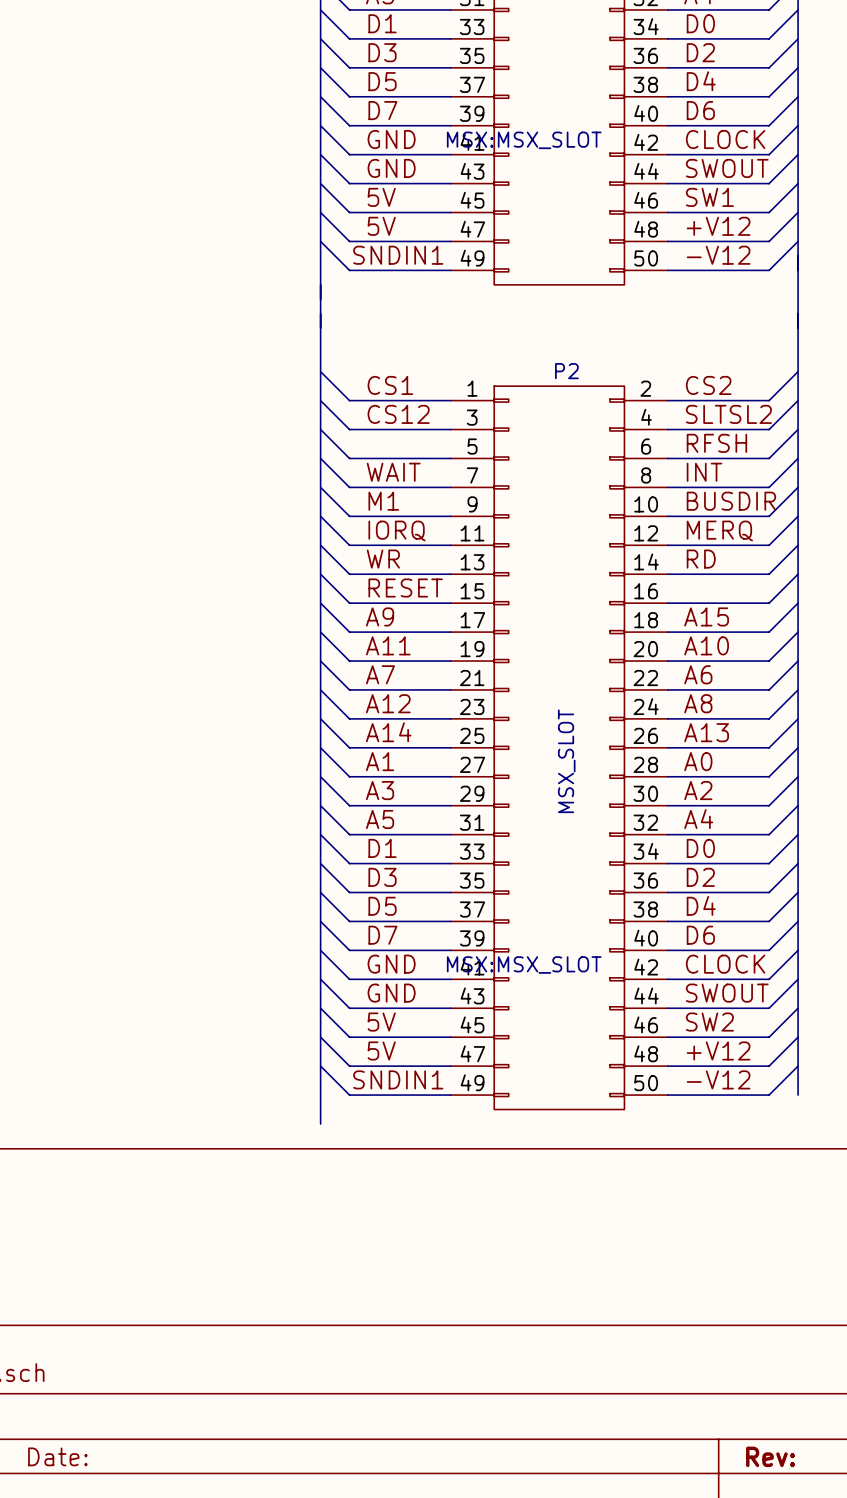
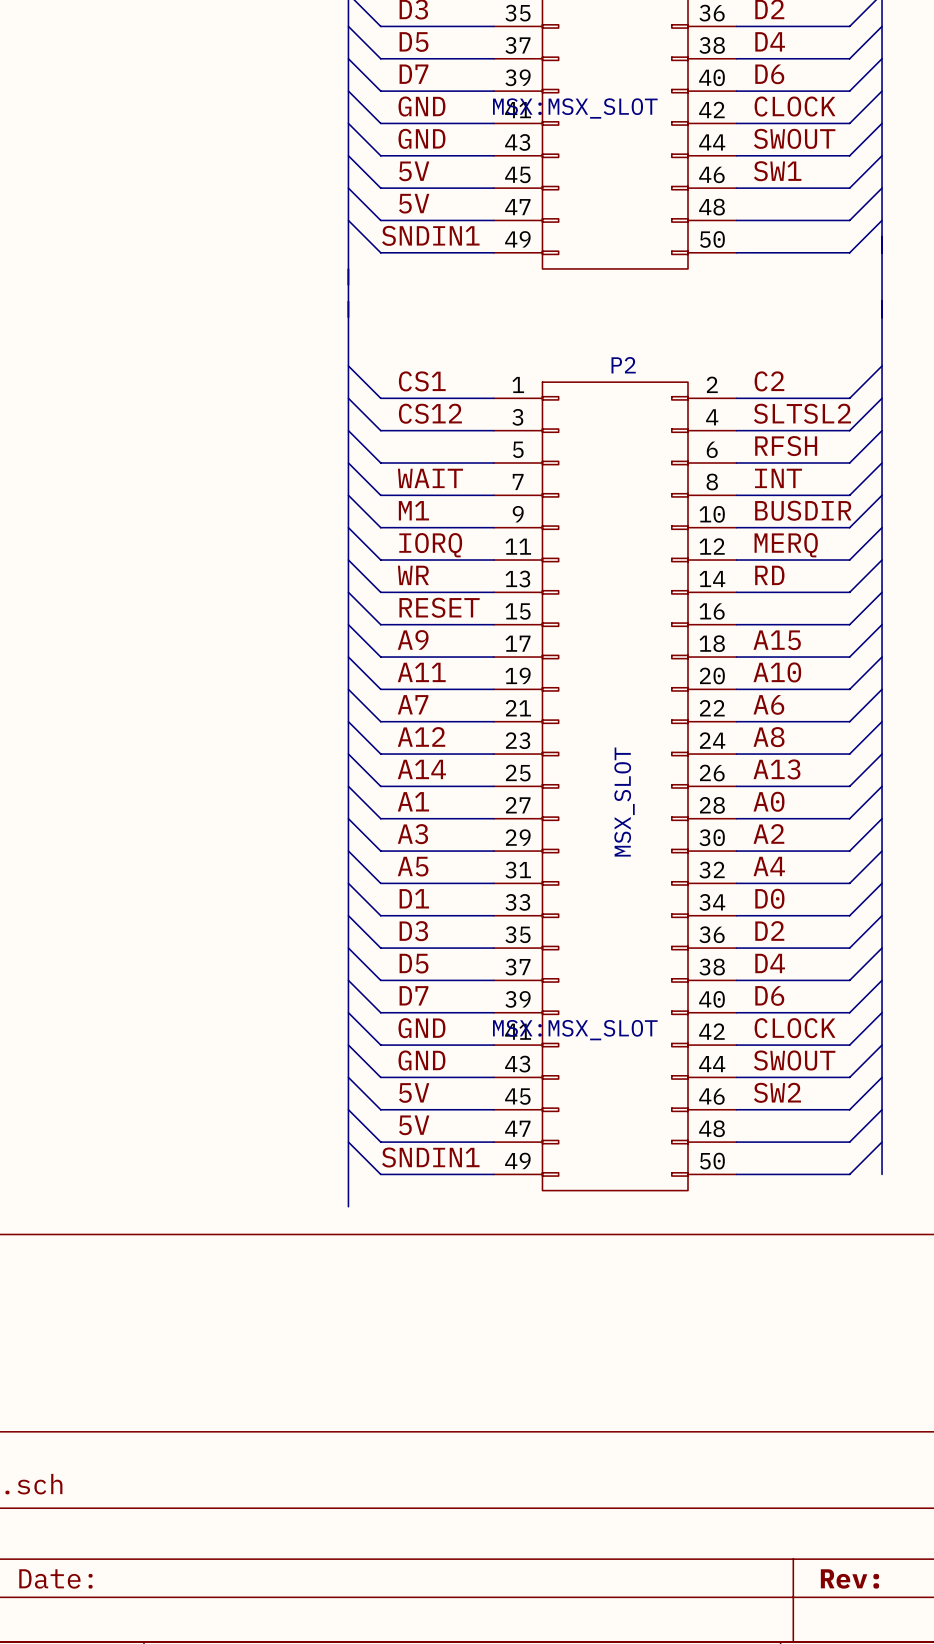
label: +V12 (718, 226) -> none
label: -V12 (718, 255) -> none
label: CS2 (708, 385) -> C2 (769, 381)
label: +V12 (718, 1050) -> none
label: -V12 (718, 1079) -> none

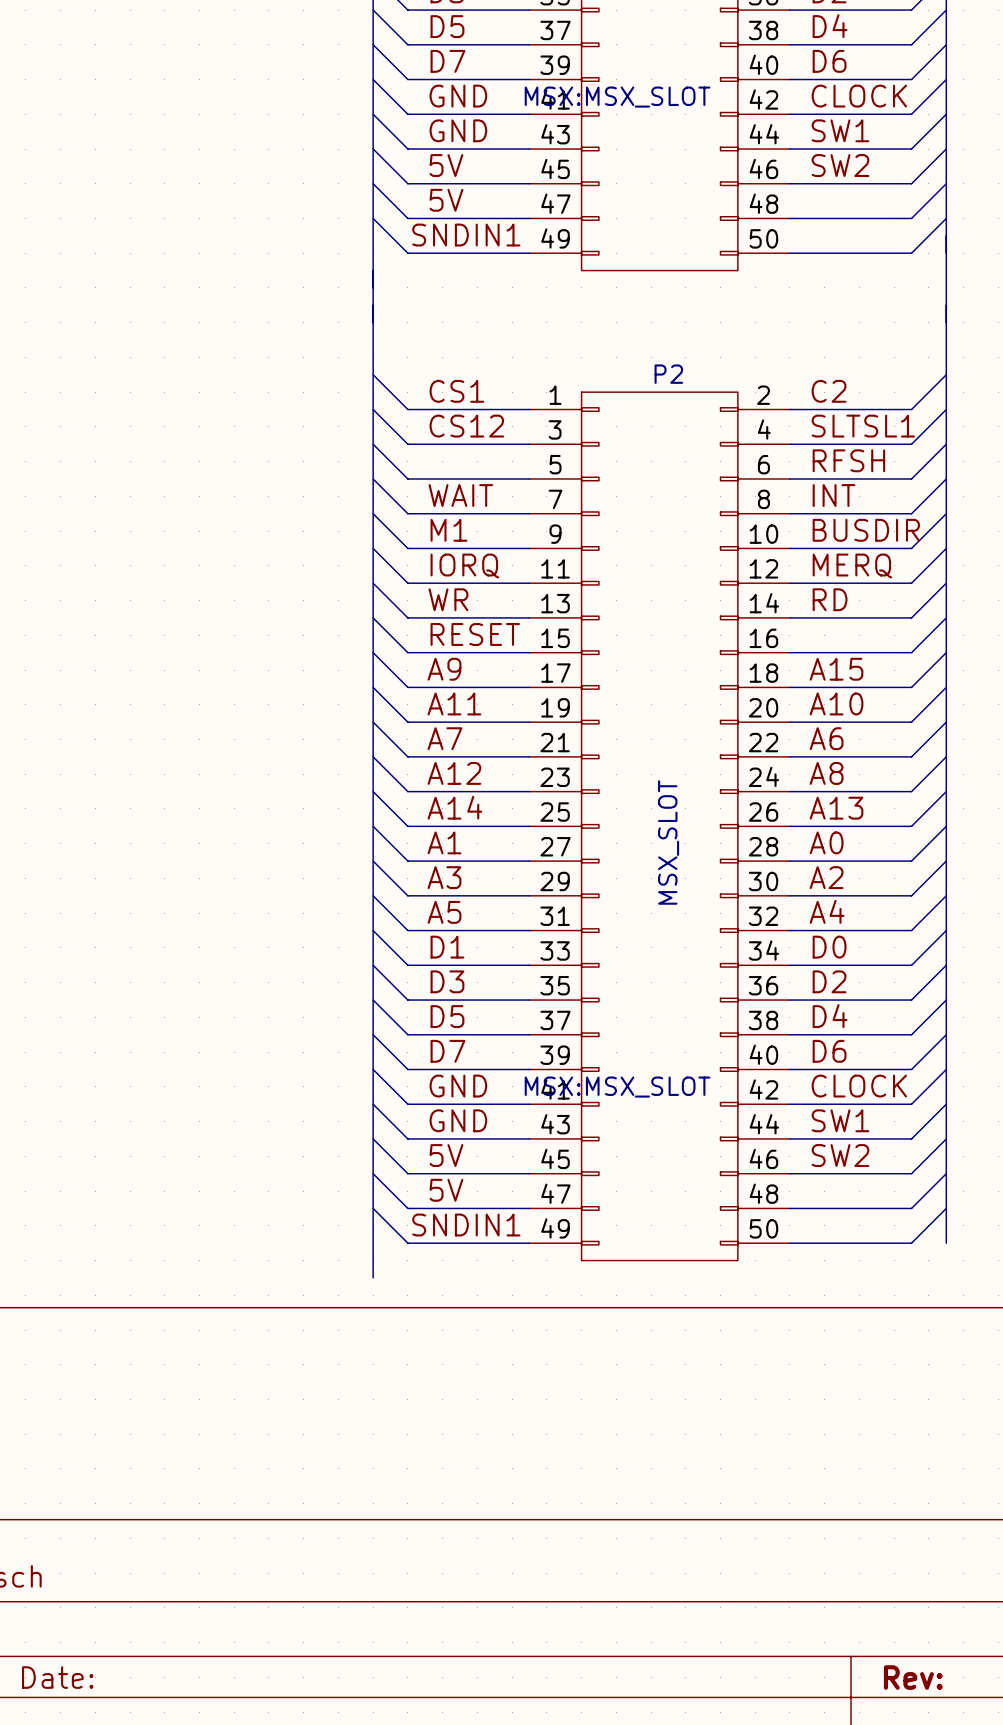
label: SWOUT (794, 138) -> SW1 (840, 130)
label: SW1 (777, 171) -> SW2 (840, 165)
label: SLTSL2 (802, 413) -> SLTSL1 (863, 426)
label: SWOUT (794, 1060) -> SW1 (840, 1120)

